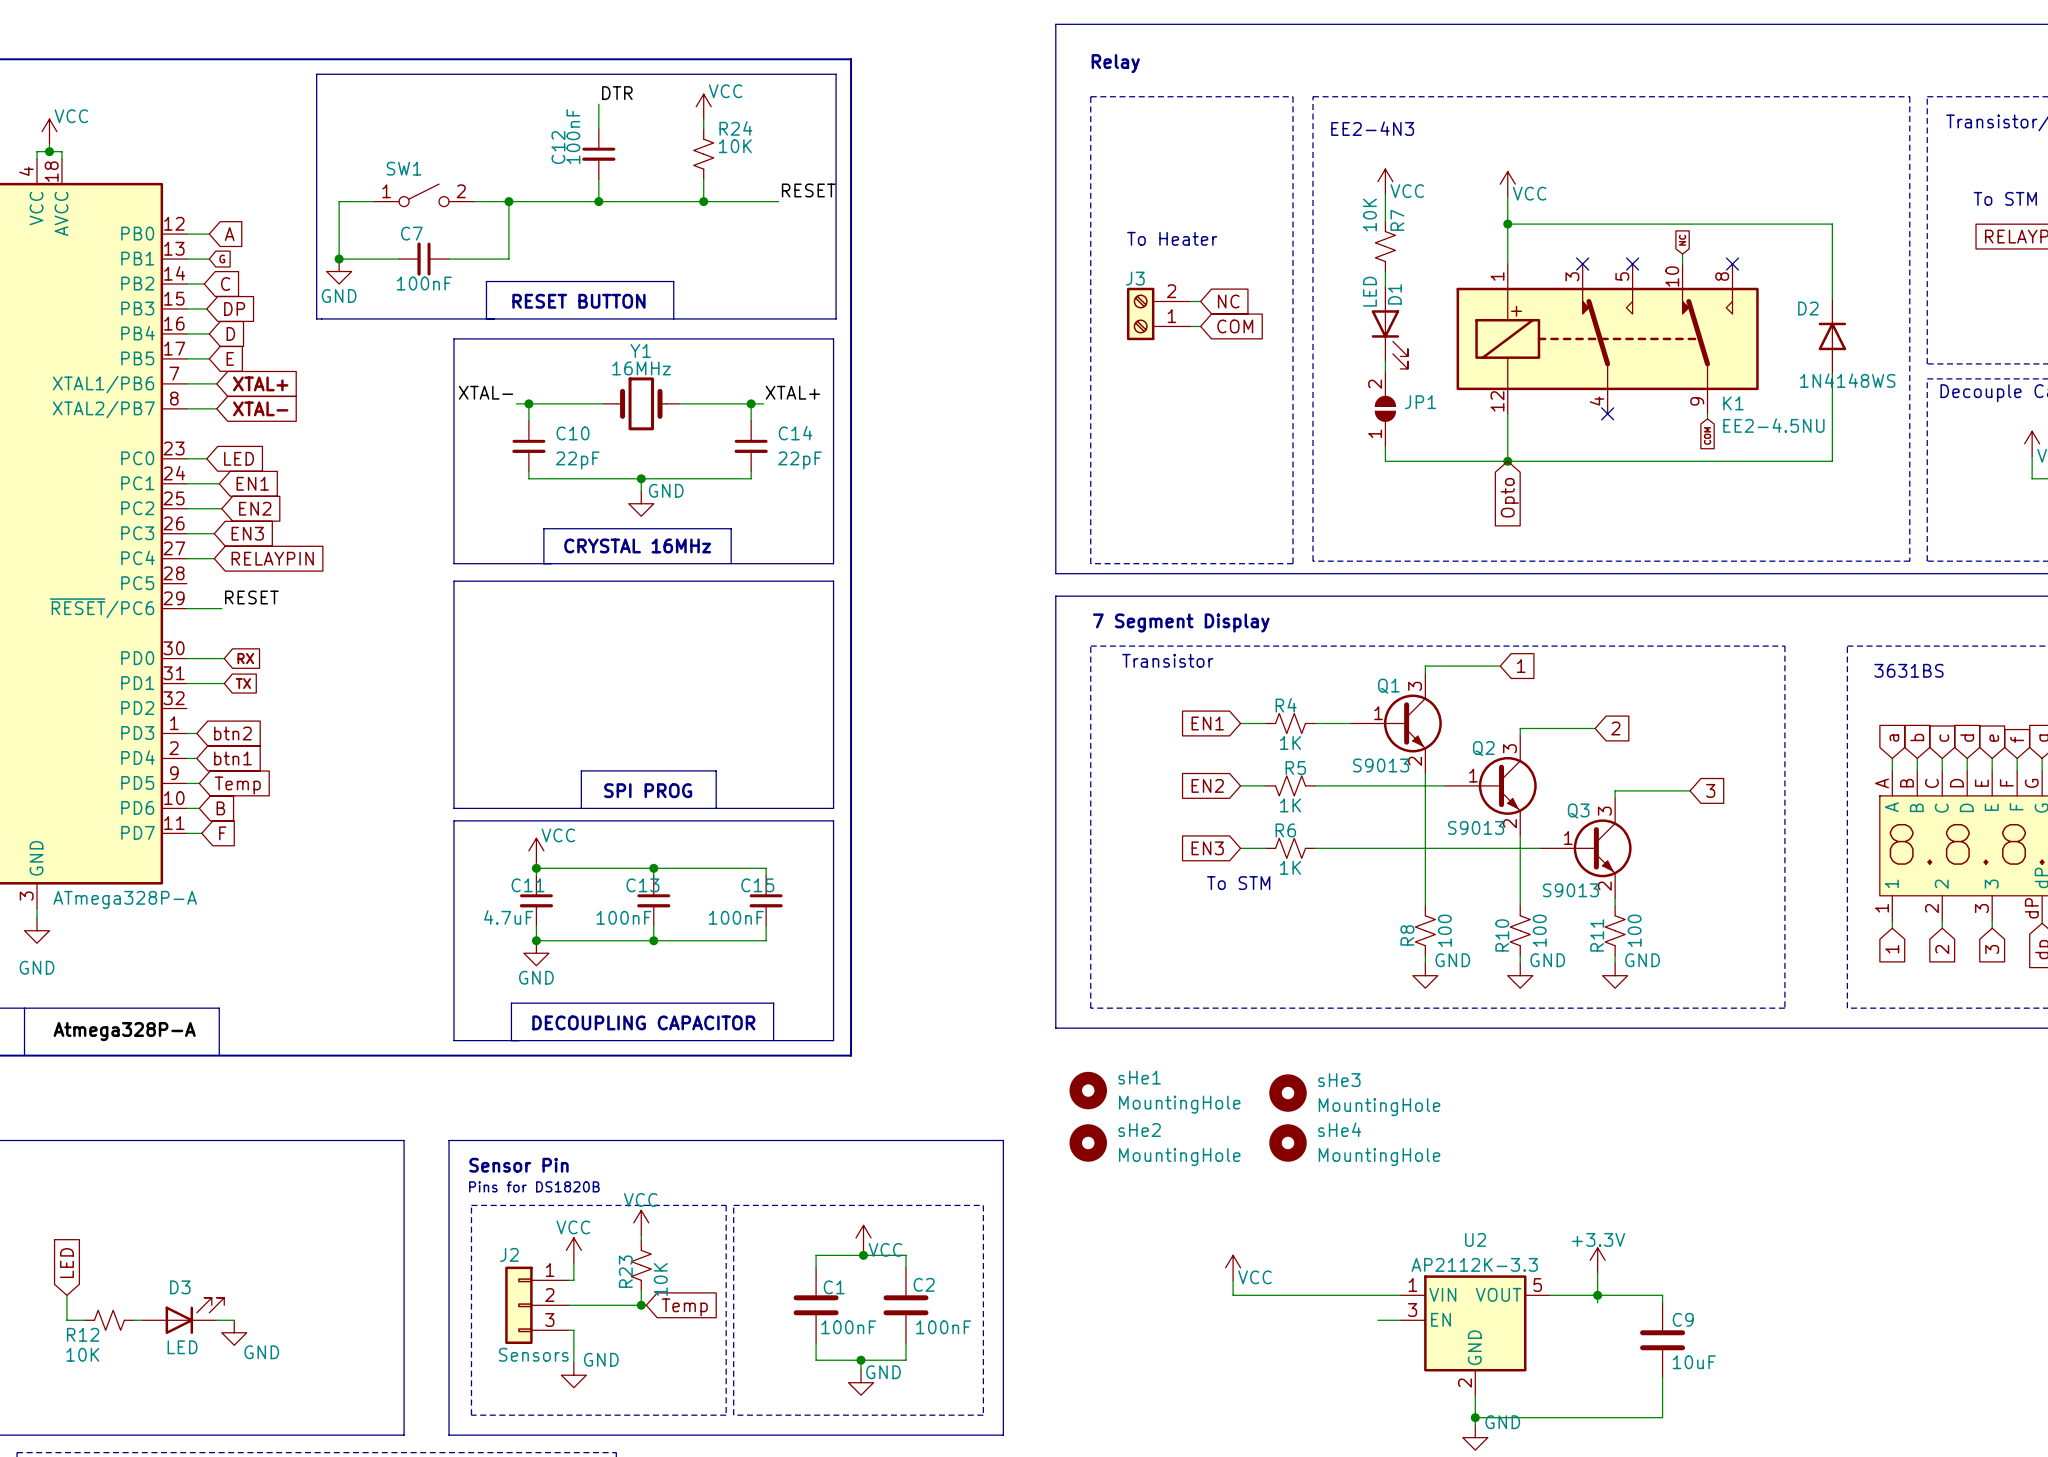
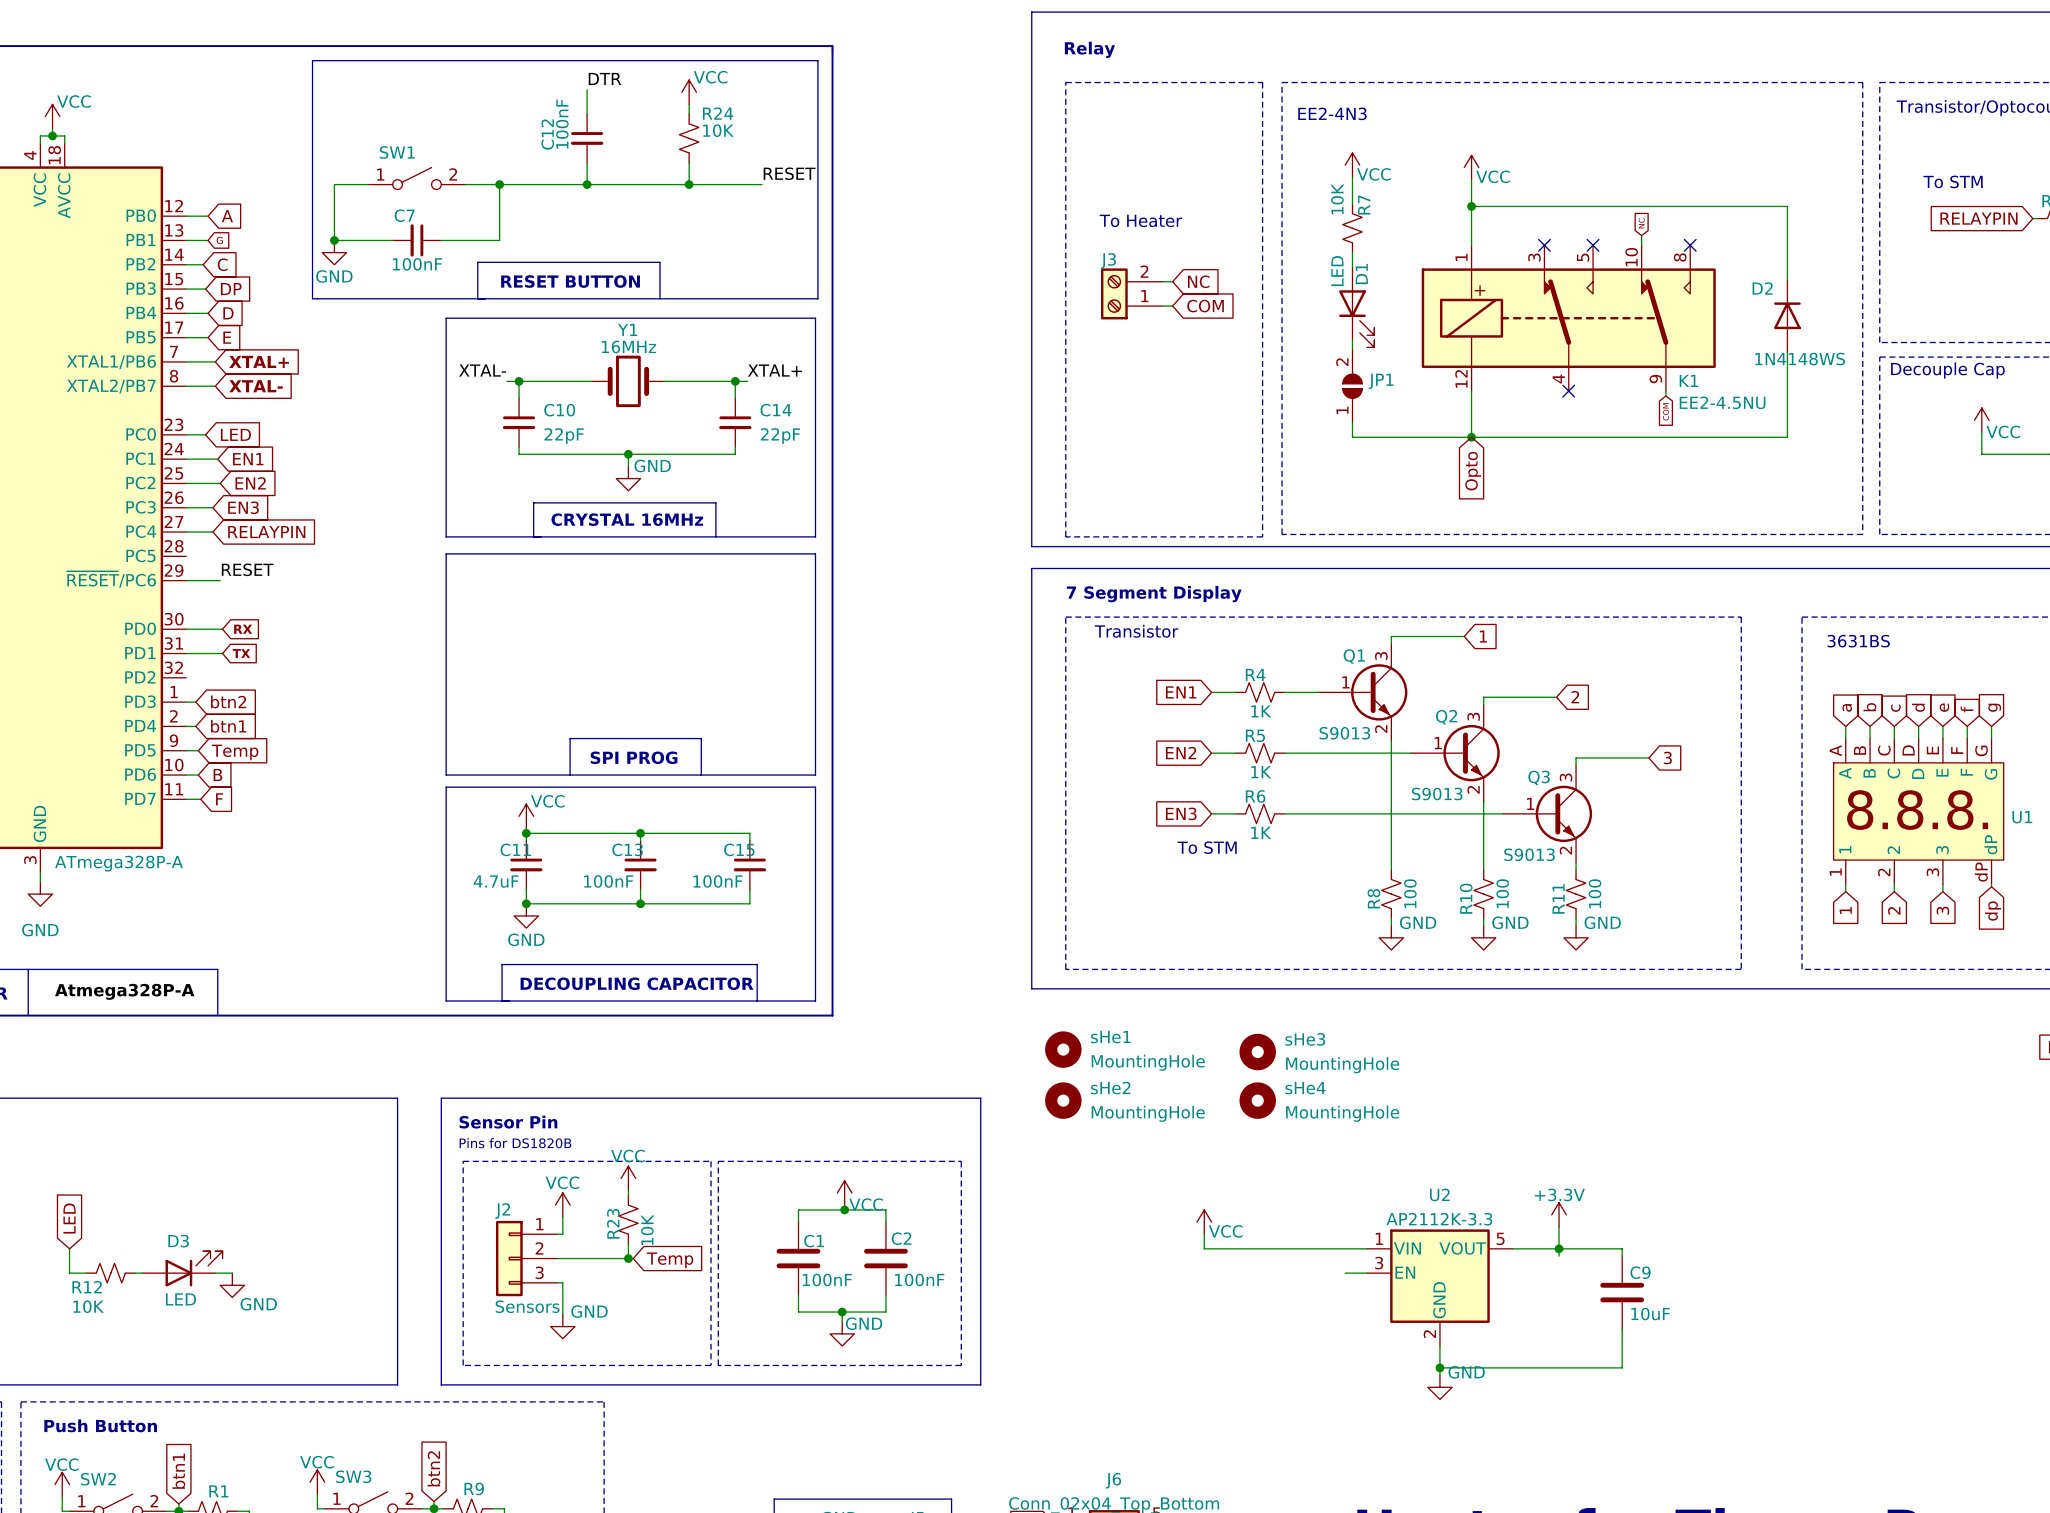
R5 flip: as is (1290, 785) -> left-right (1260, 753)

